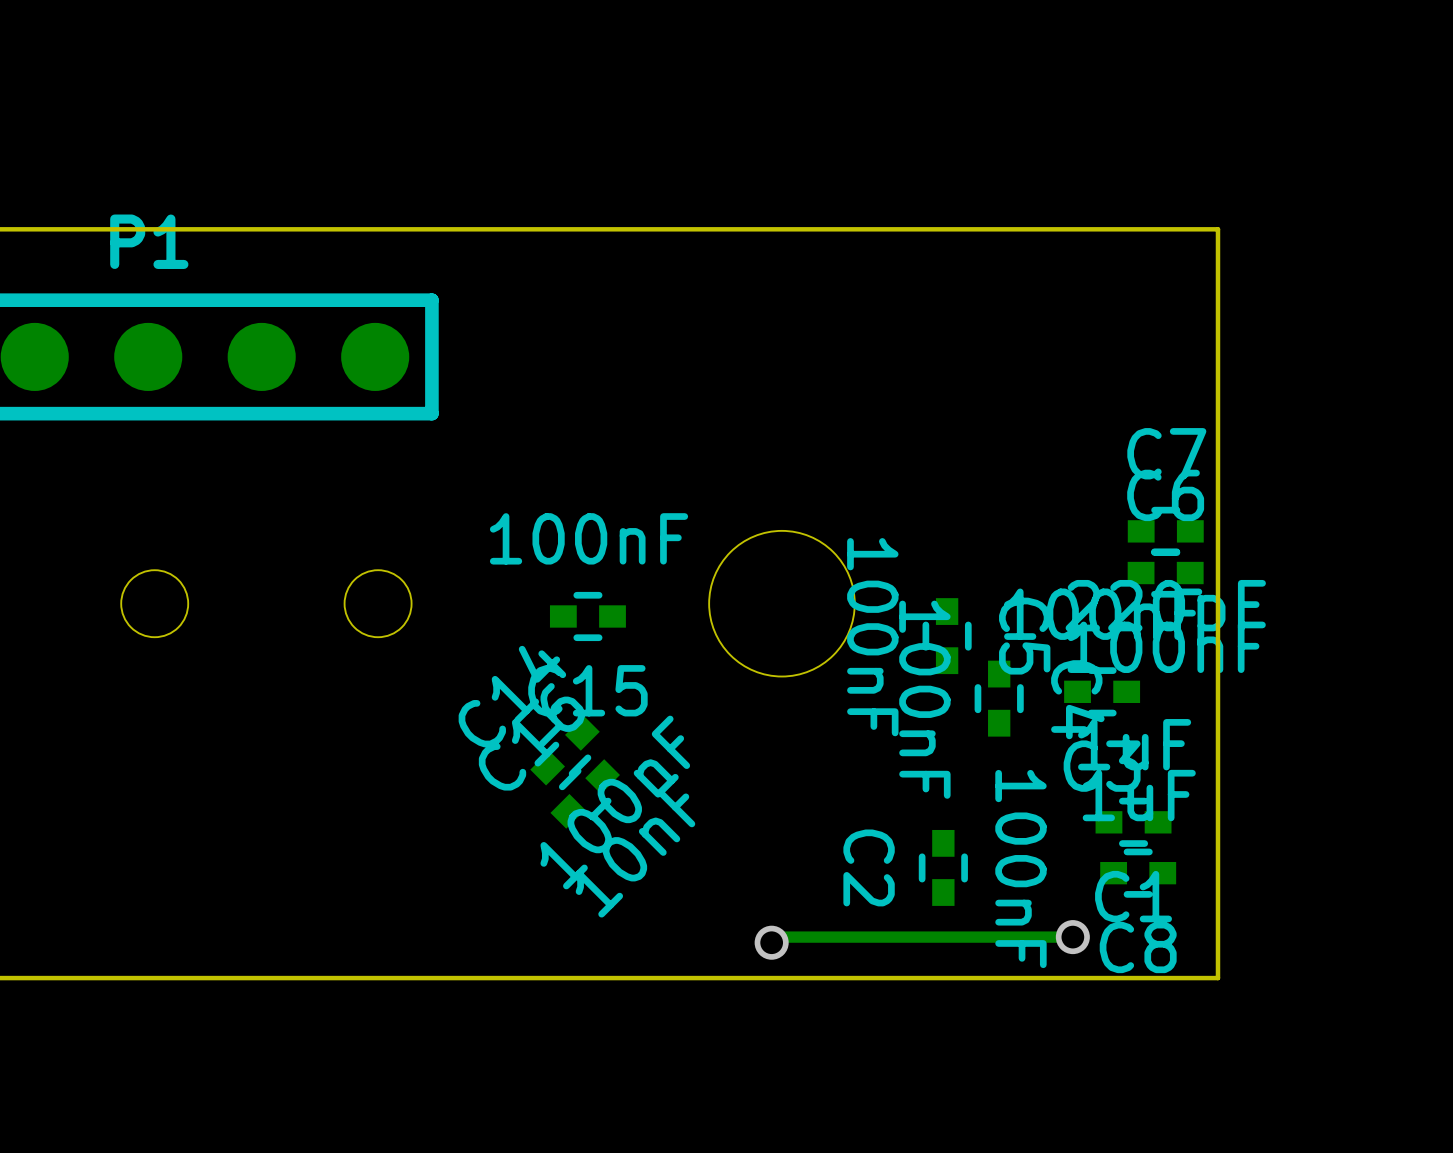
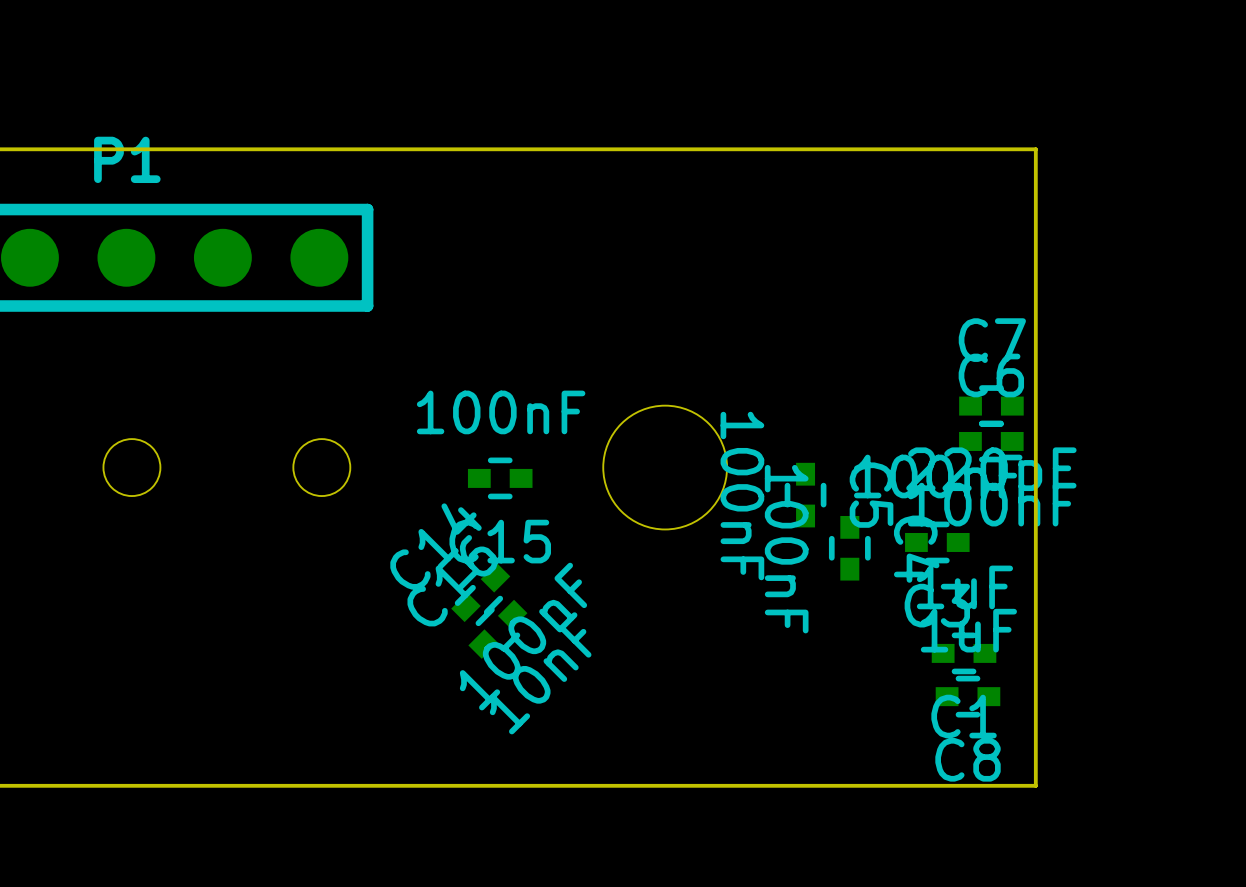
C2: 100nF (943, 867) -> none
track: (1072, 937) (777, 937) (771, 942) -> none
via: (1072, 937) -> none
via: (771, 942) -> none

